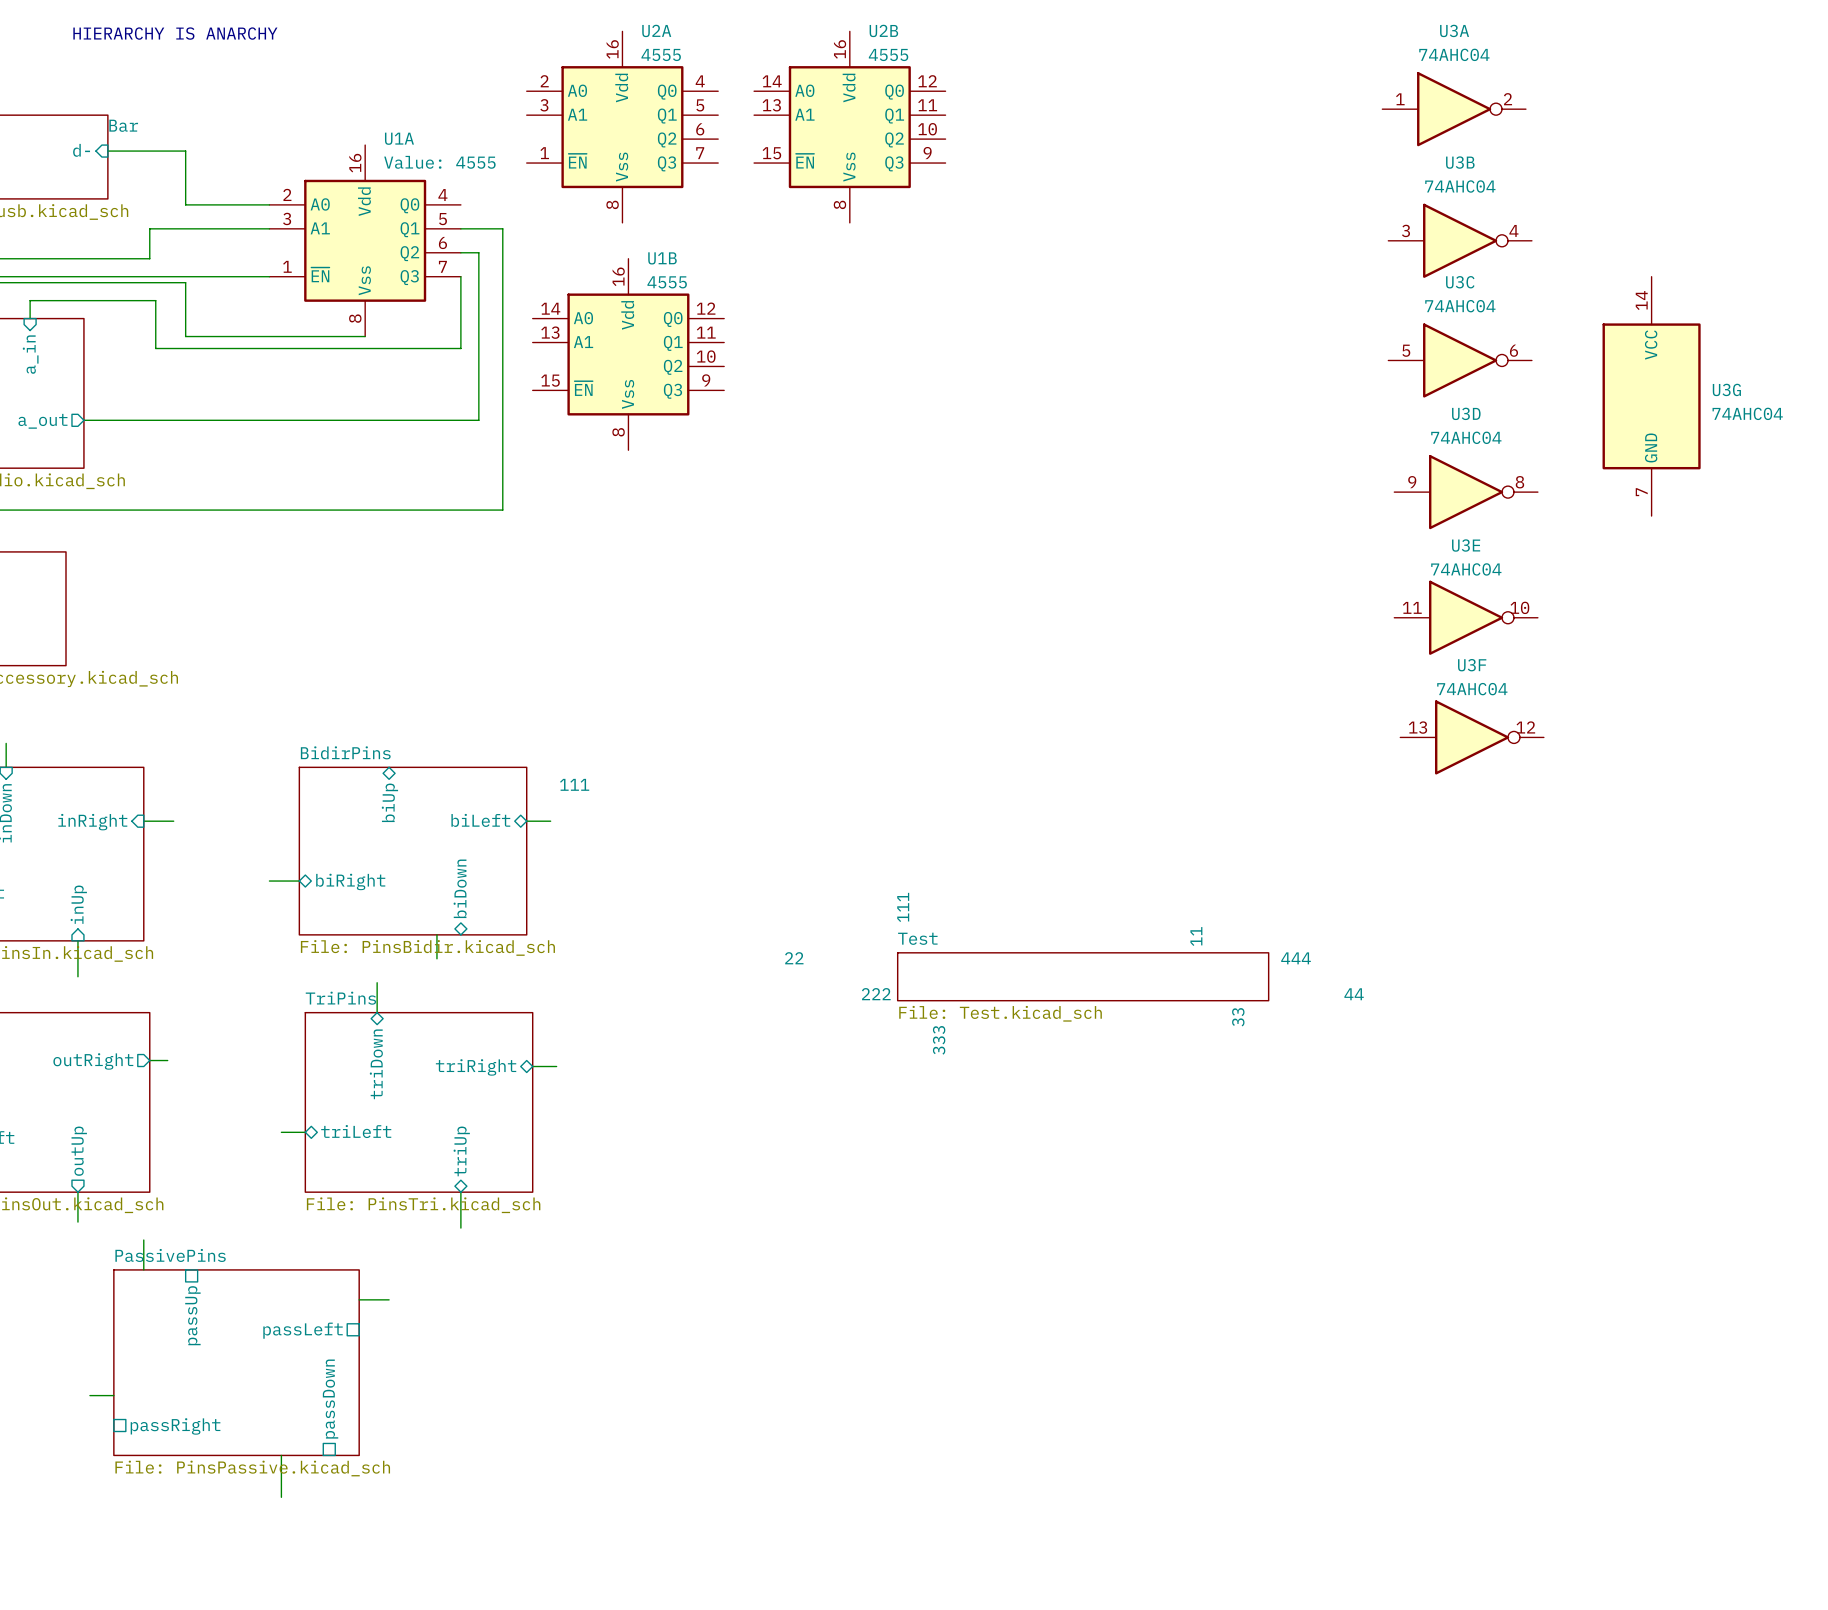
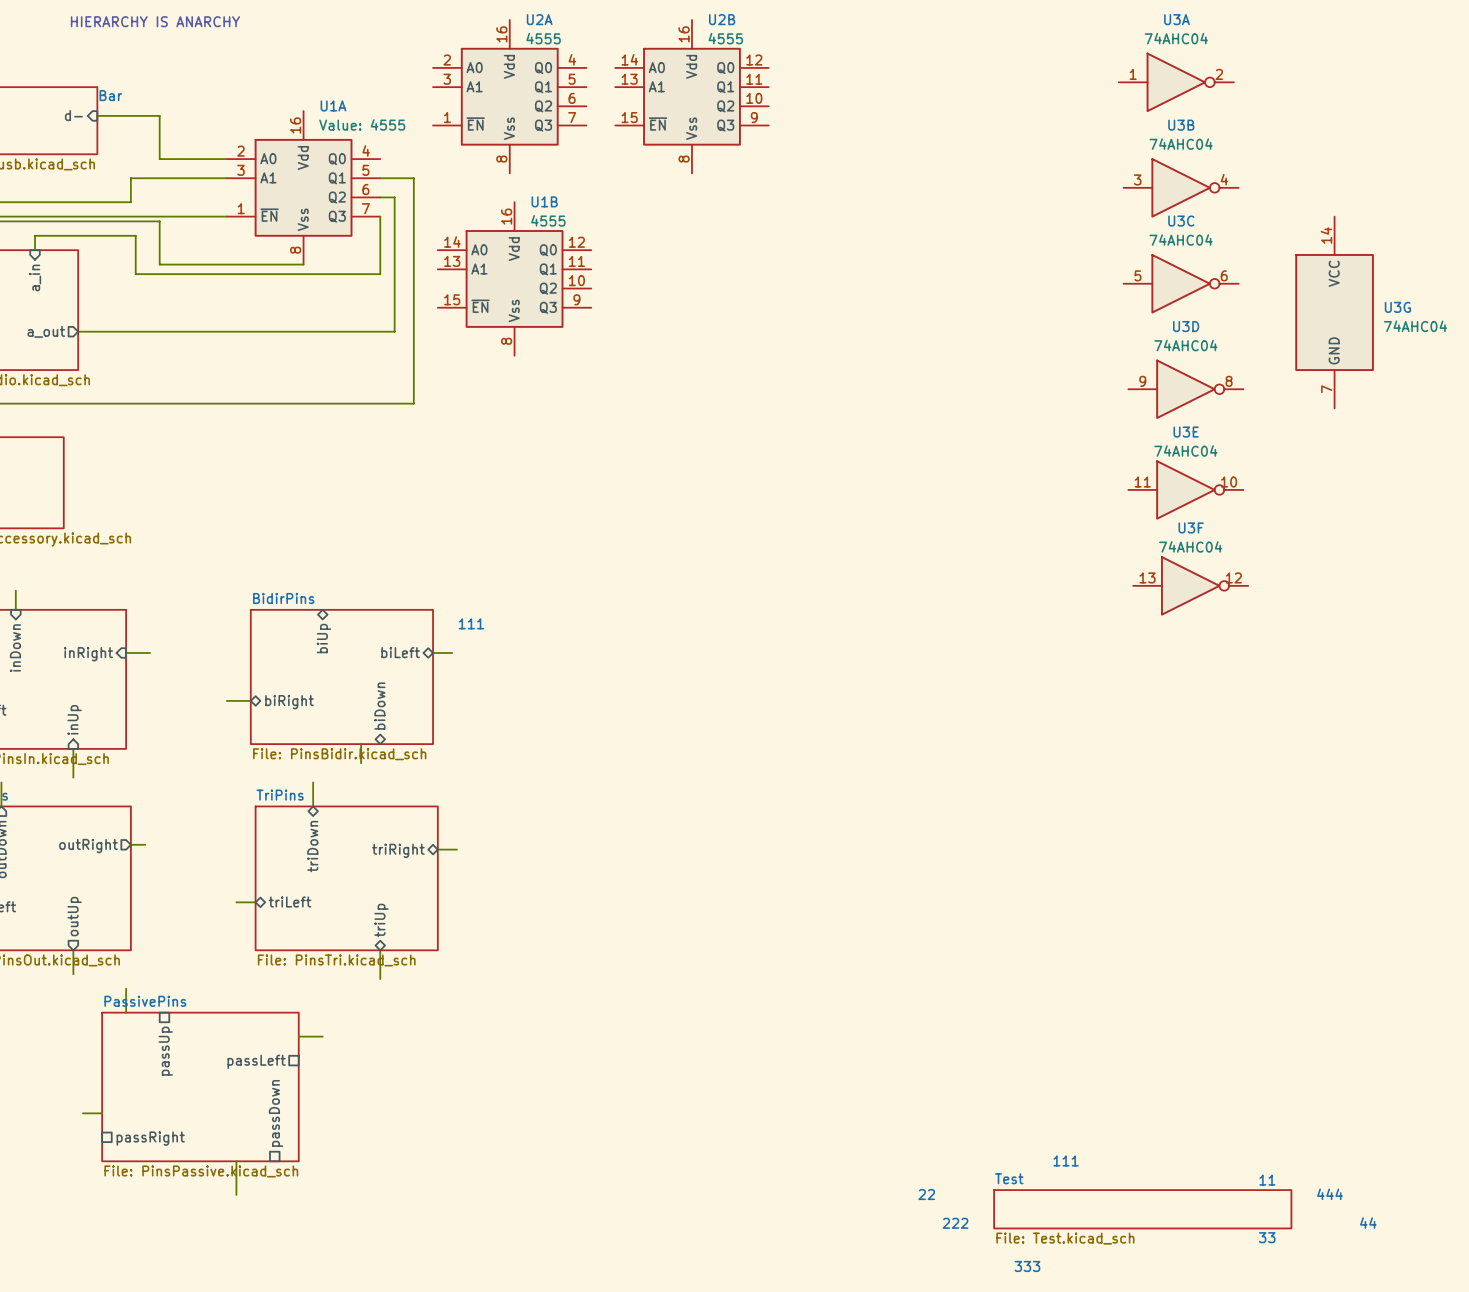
sheet Test: File: Test.kicad_sch (1083, 976) -> none
sheet Test: none -> File: Test.kicad_sch (1142, 1209)

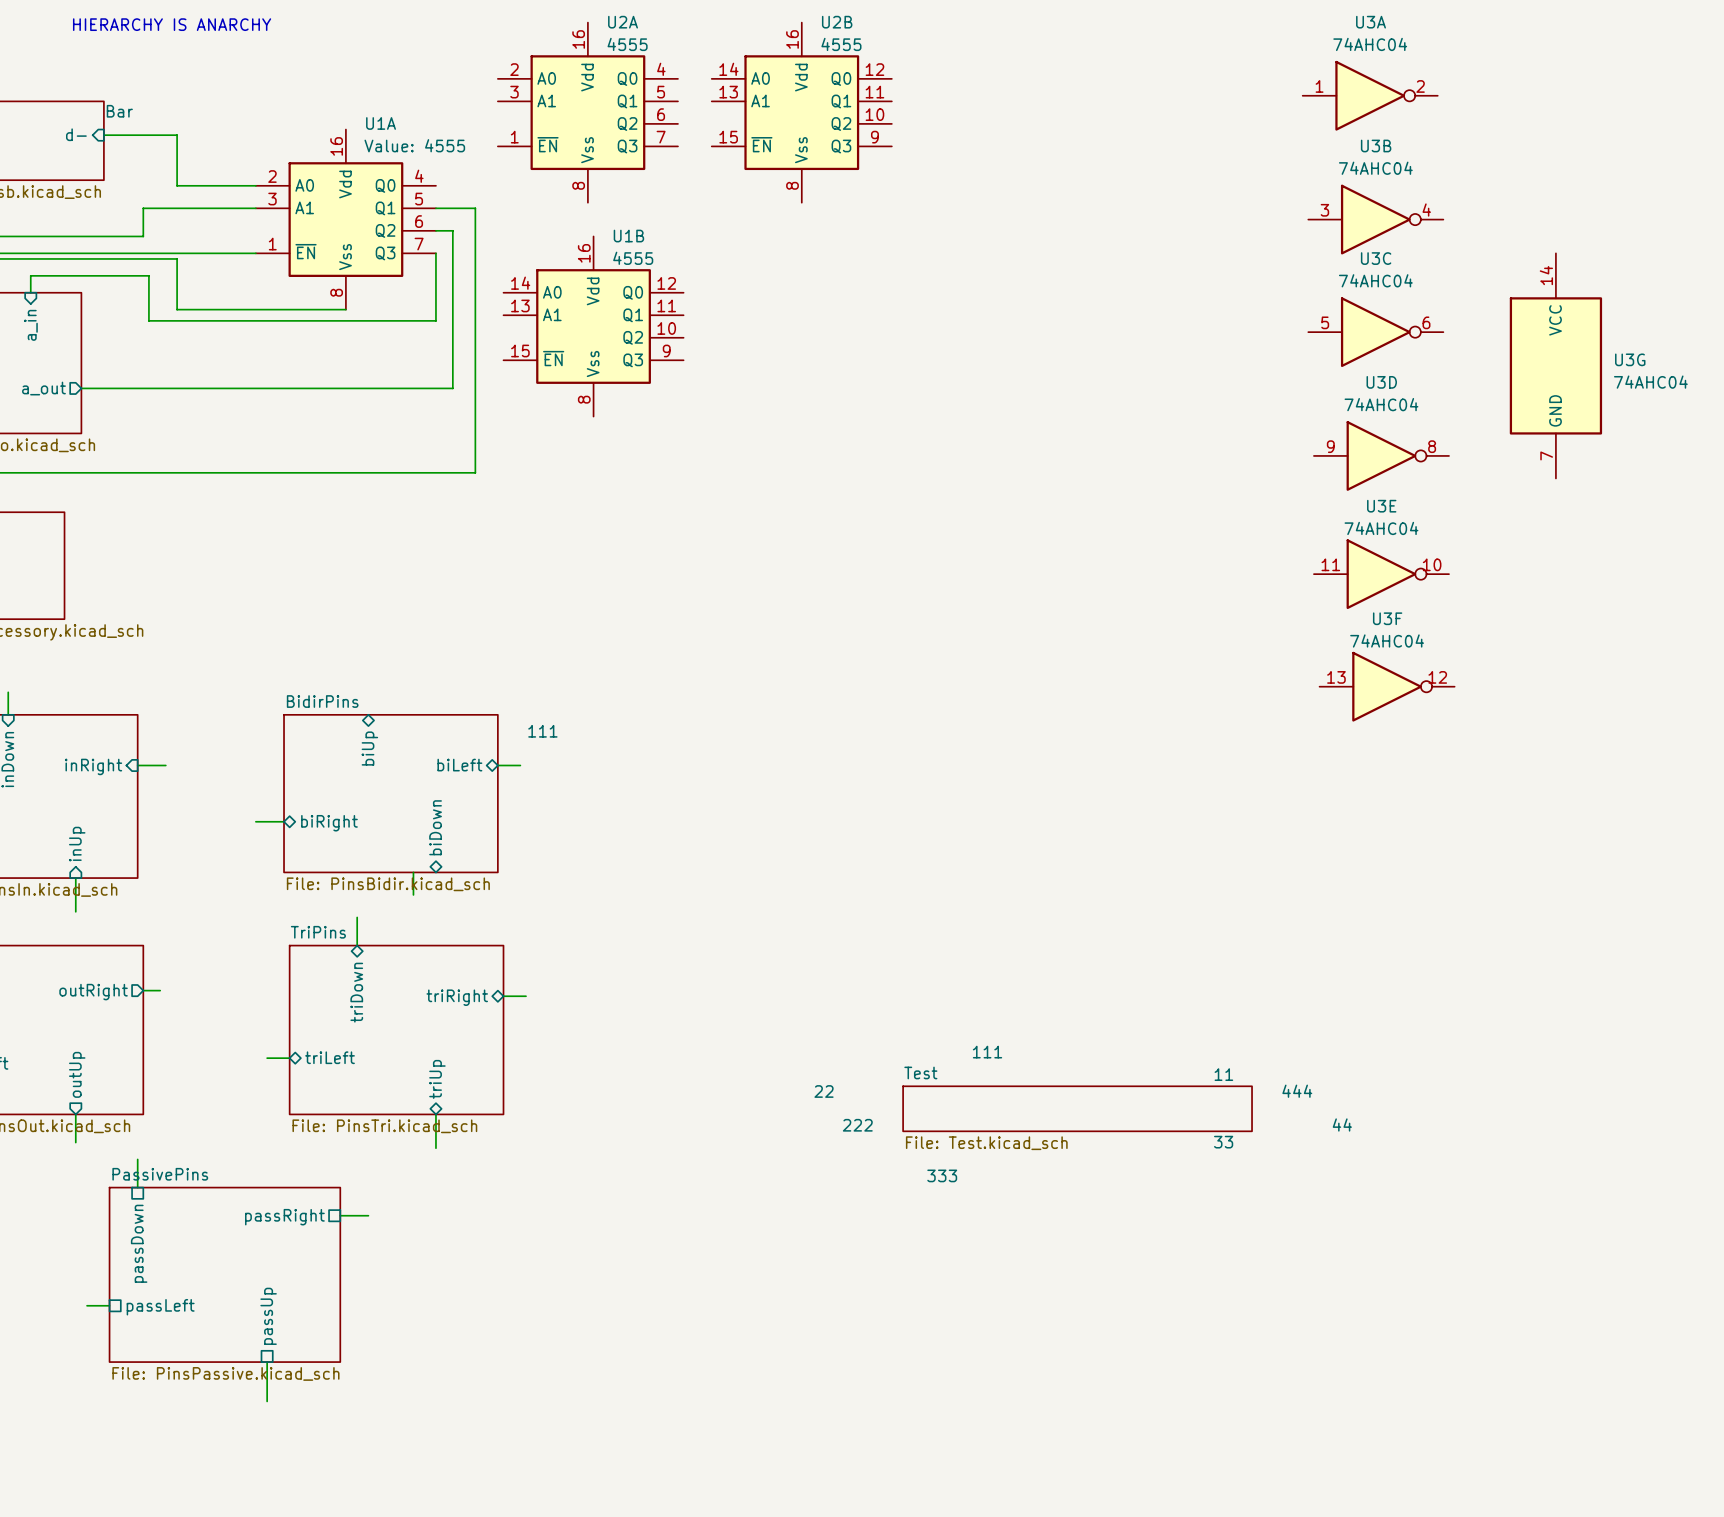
sheet Test: none -> File: Test.kicad_sch (1077, 1108)
sheet pin: none -> passRight (284, 1217)
sheet pin rotation: 0° (165, 1051) -> 180° (268, 1316)
sheet pin position: passUp (165, 1051) -> passUp (268, 1316)
sheet pin: none -> passDown (139, 1243)
sheet pin rotation: 0° (256, 1061) -> 180° (160, 1307)
sheet pin position: passLeft (256, 1061) -> passLeft (160, 1307)
sheet pin: passDown (276, 1113) -> none
sheet pin: passRight (150, 1138) -> none
sheet Test: File: Test.kicad_sch (1142, 1209) -> none

